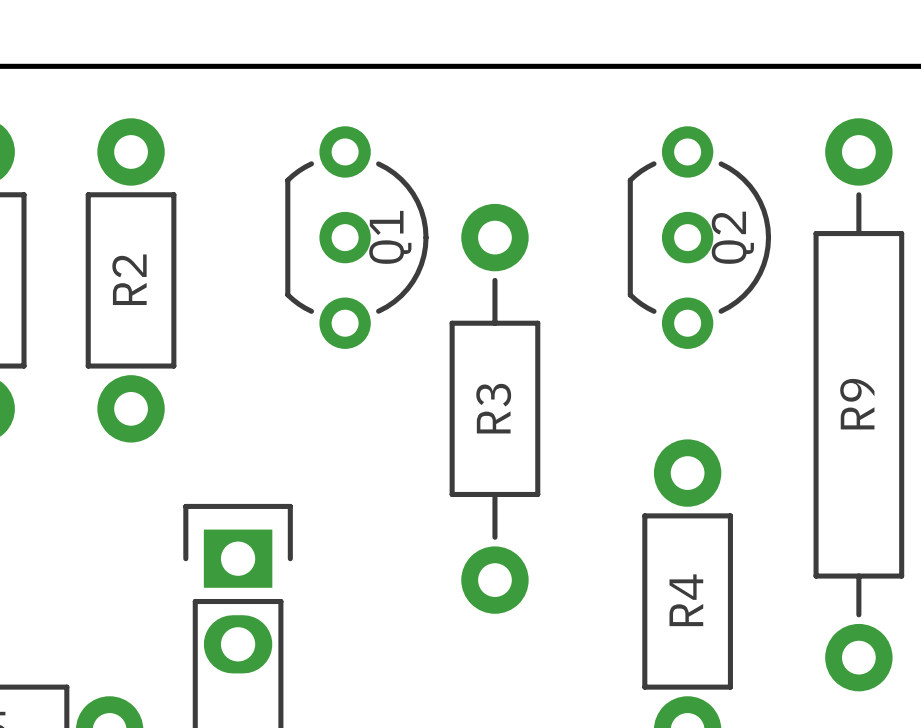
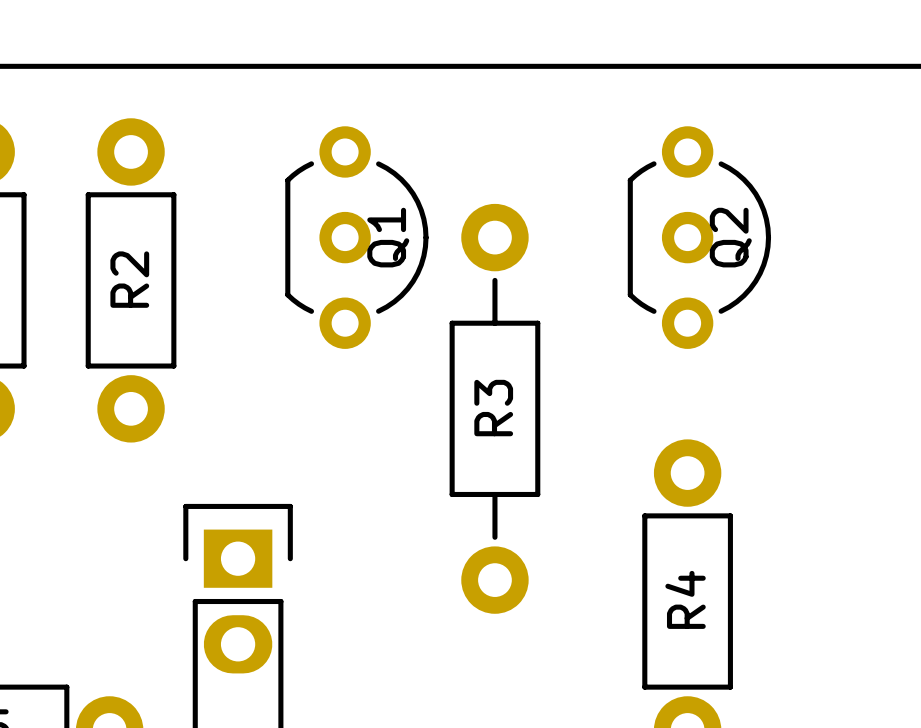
R9: (858, 404) -> none

